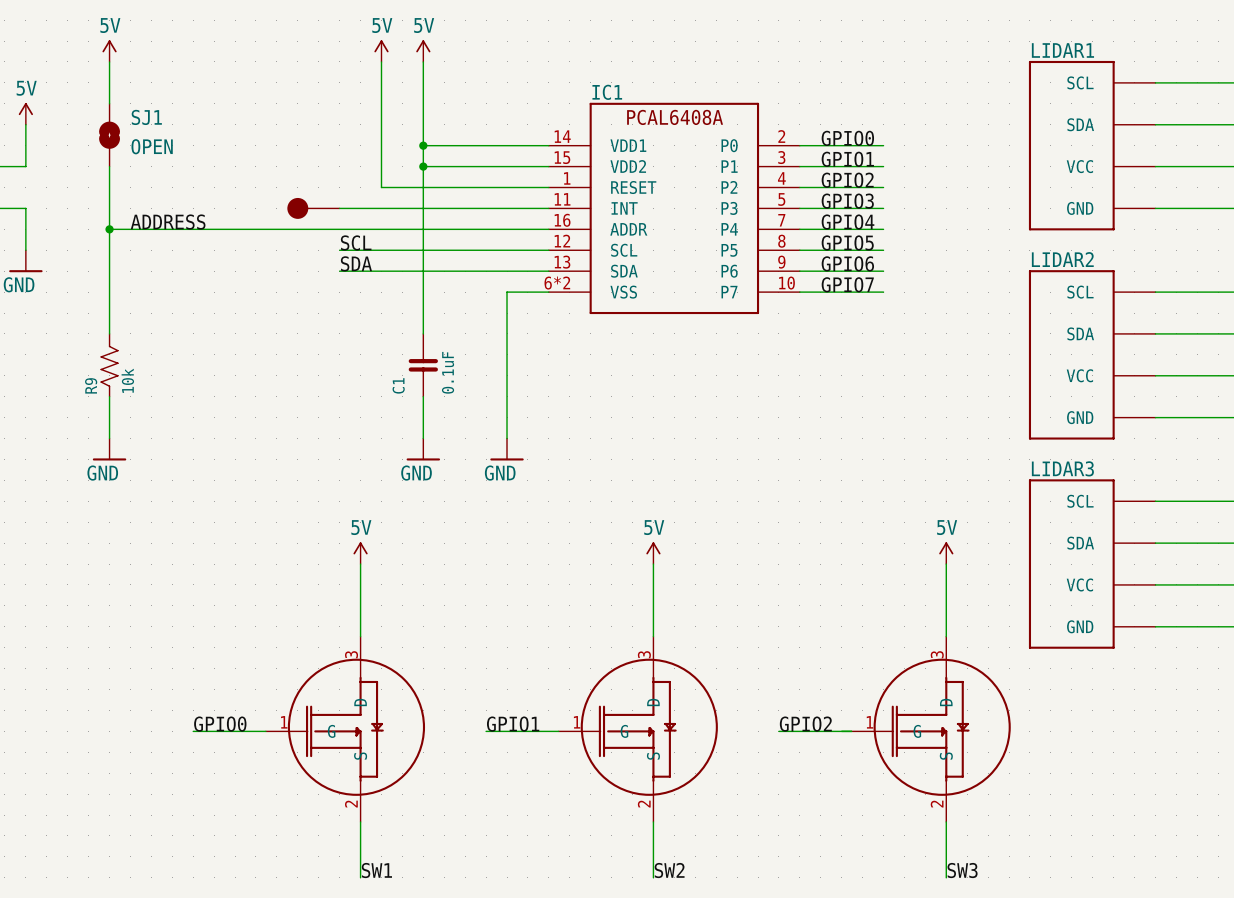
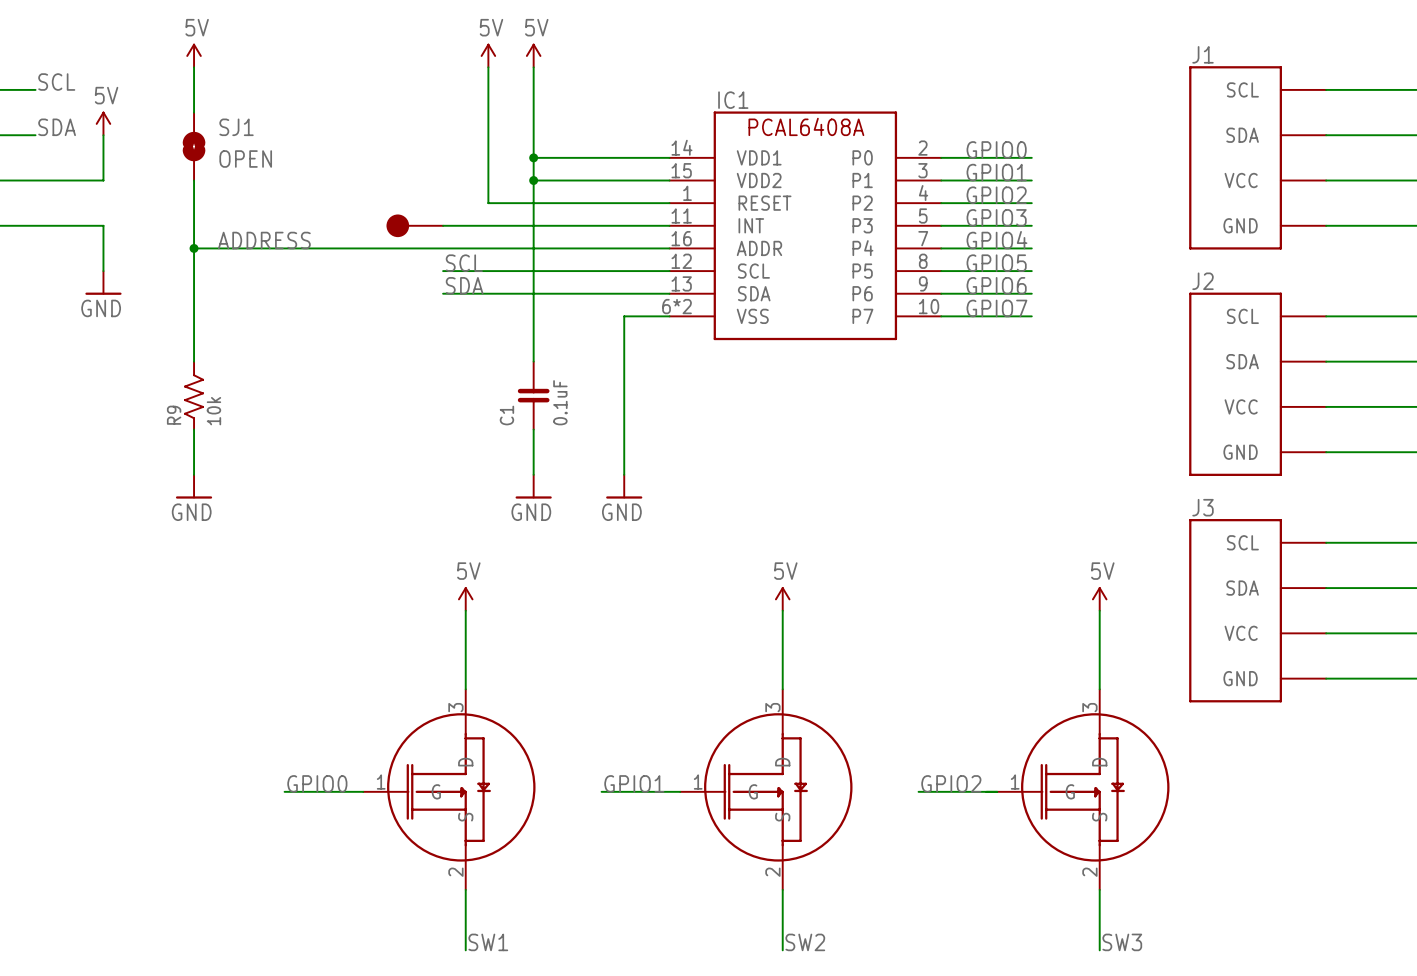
LIDAR1 name: LIDAR1 (1062, 50) -> J1 (1203, 54)
LIDAR2 name: LIDAR2 (1062, 259) -> J2 (1203, 281)
LIDAR3 name: LIDAR3 (1062, 468) -> J3 (1203, 507)

